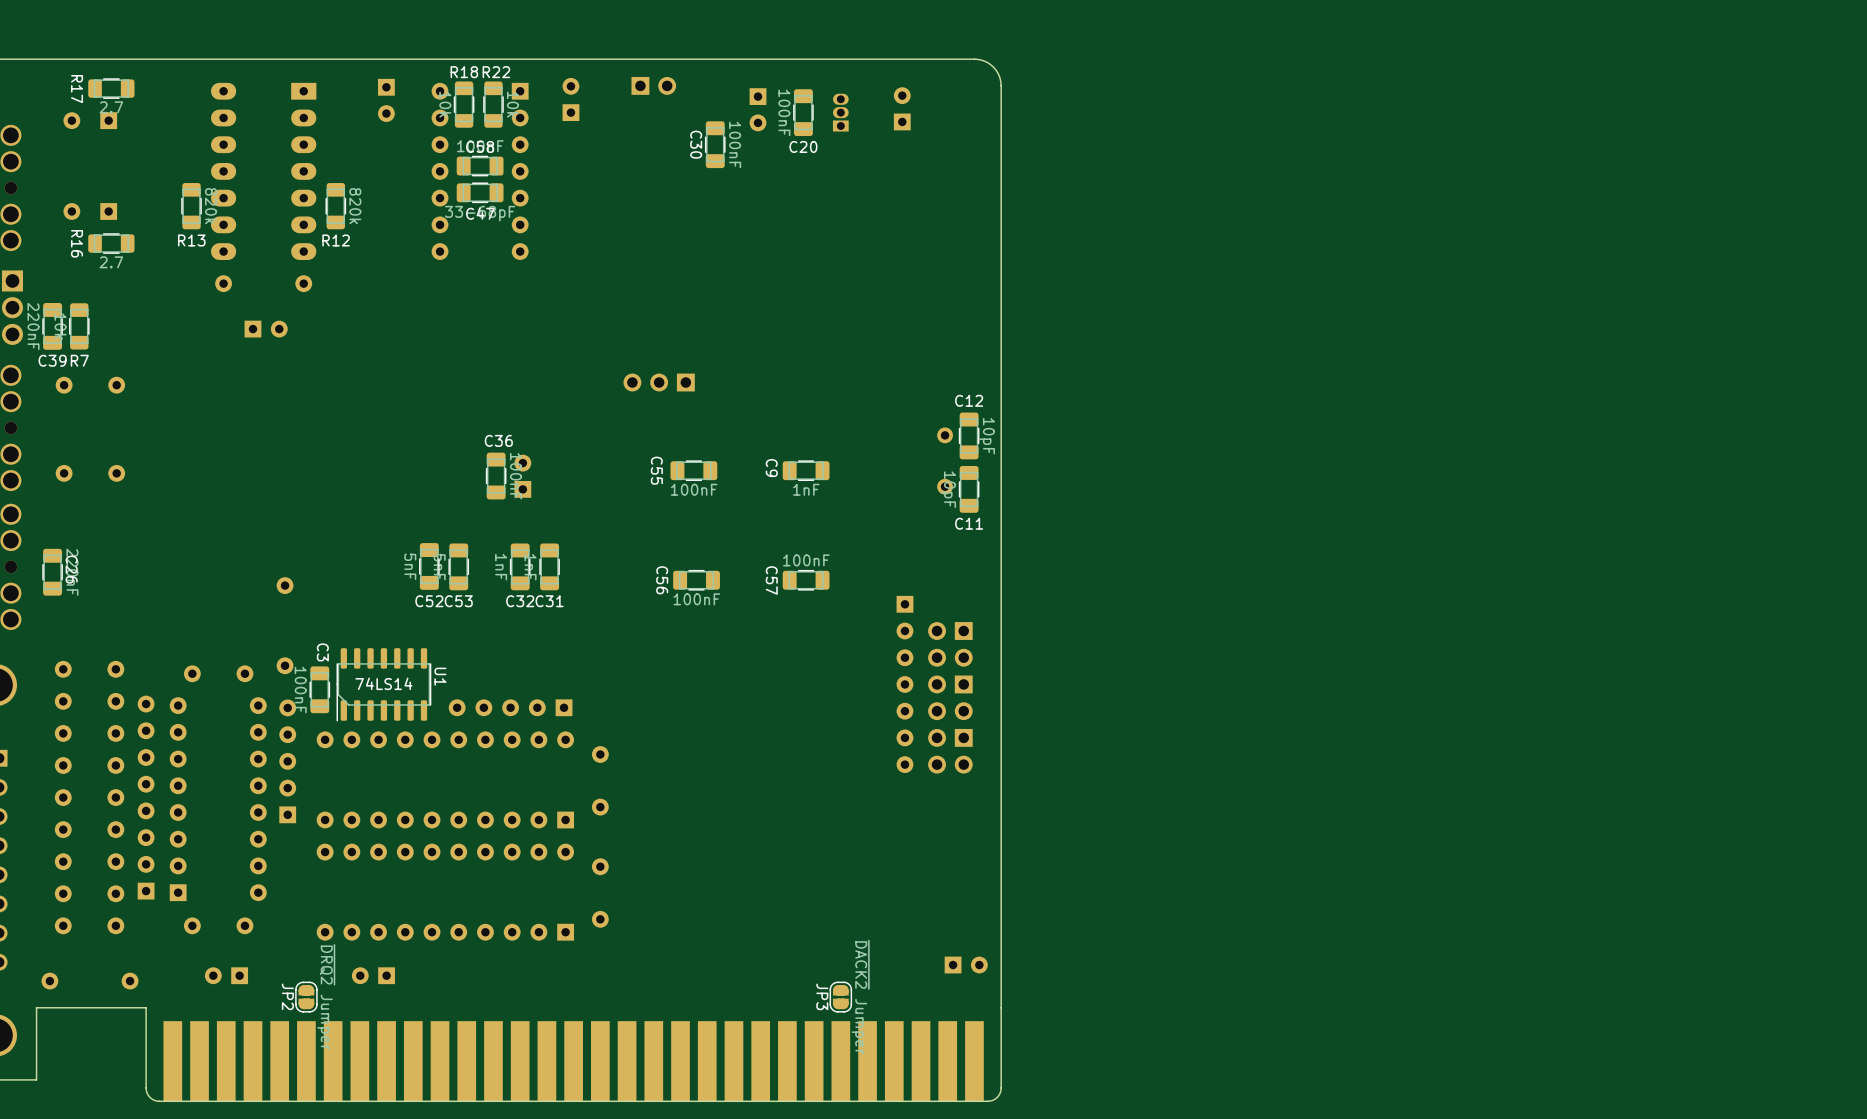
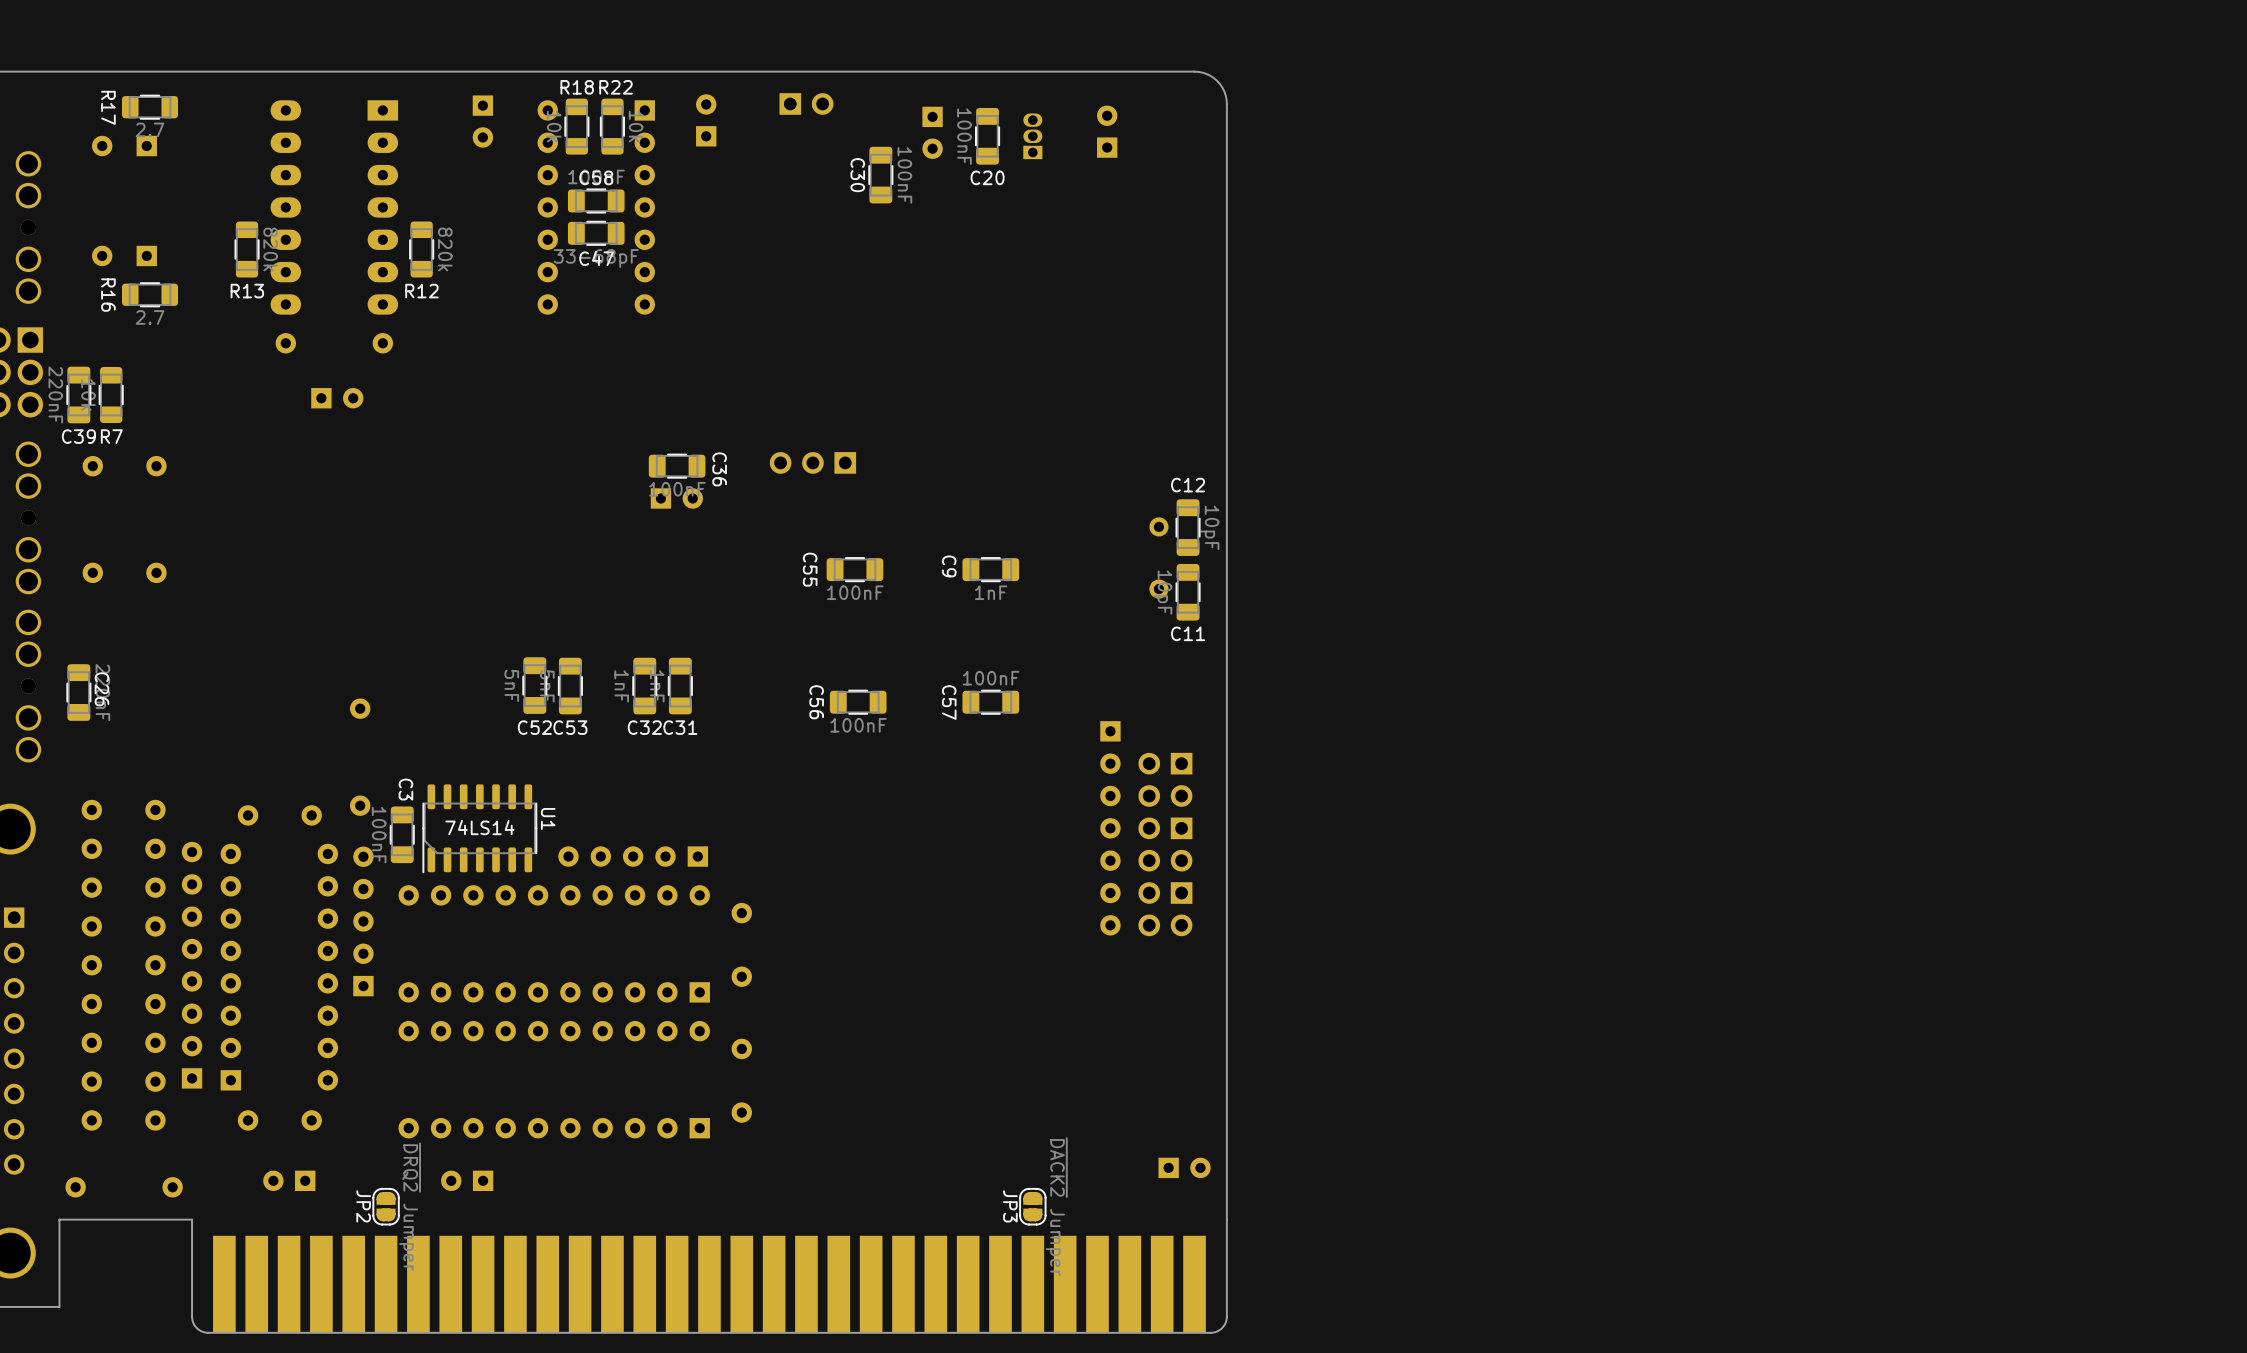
C36 rotation: 0° (496, 476) -> 90° clockwise (677, 466)
C36 position: (496, 476) -> (677, 466)
part rotation: 0° (522, 476) -> 90° clockwise (676, 498)
part position: (522, 476) -> (676, 498)

